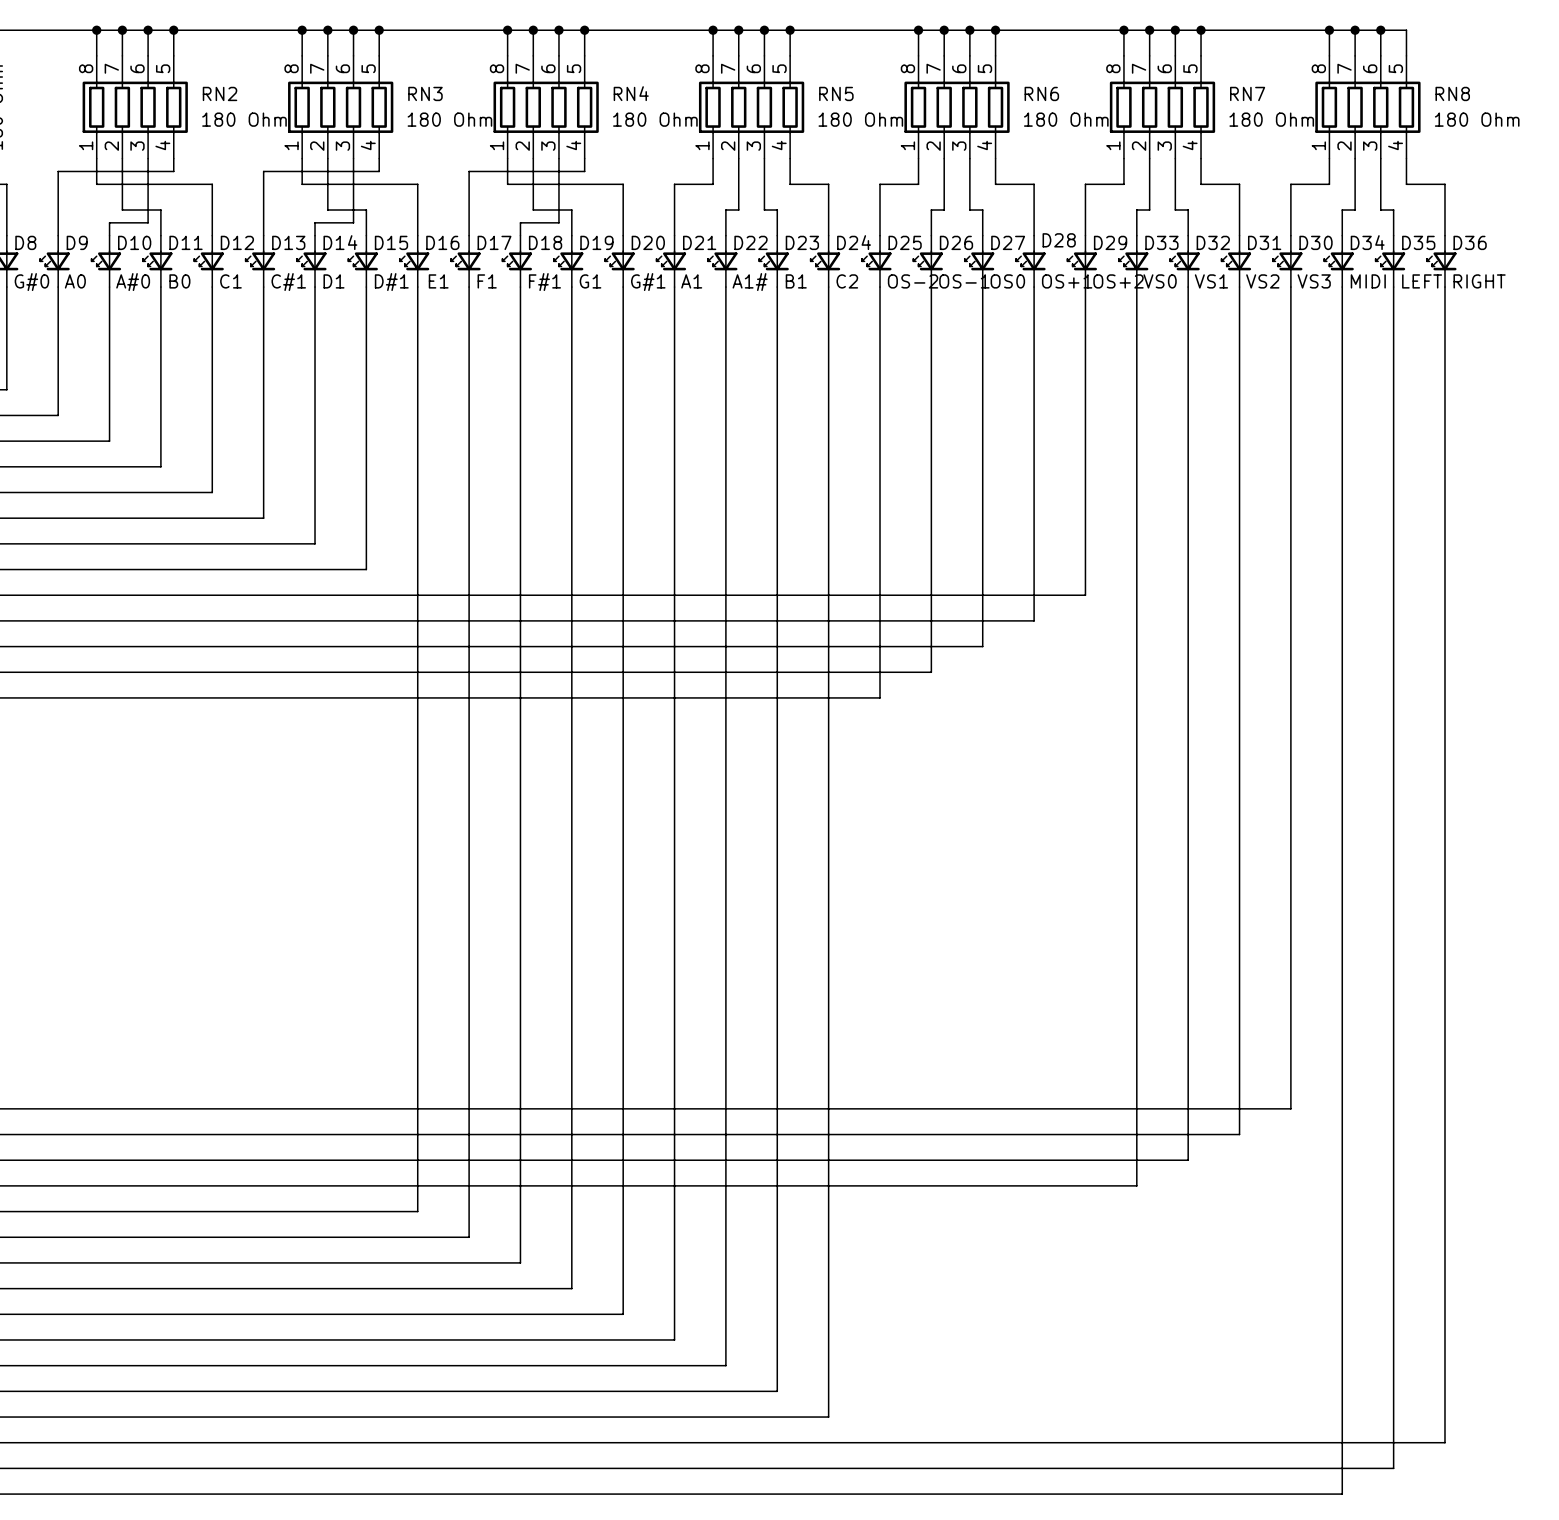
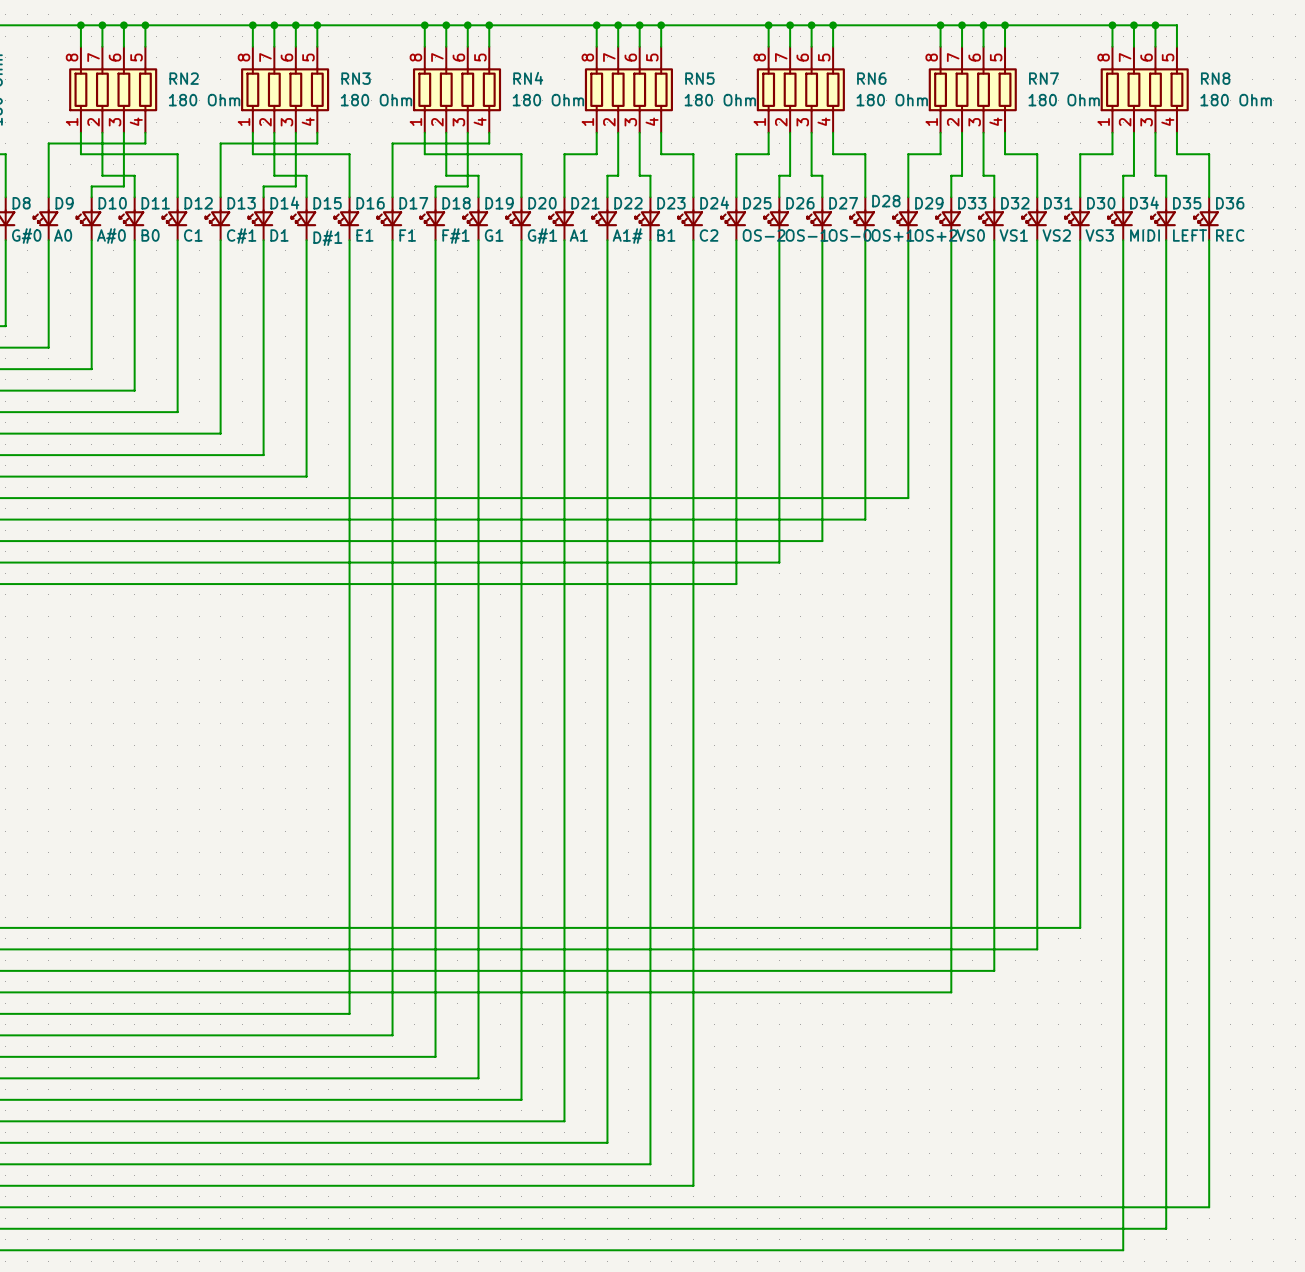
D16 text: none -> E1 (364, 235)
D16 value: E1 (438, 281) -> none
D27 value: OS0 (1007, 281) -> none
D27 text: none -> OS-0 (850, 235)
D28 text: none -> OS+1 (893, 235)
D28 value: OS+1 (1067, 281) -> none
D36 text: none -> REC (1230, 235)
D36 value: RIGHT (1479, 281) -> none
D15 value: D#1 (391, 282) -> none
D15 text: none -> D#1 (327, 238)

